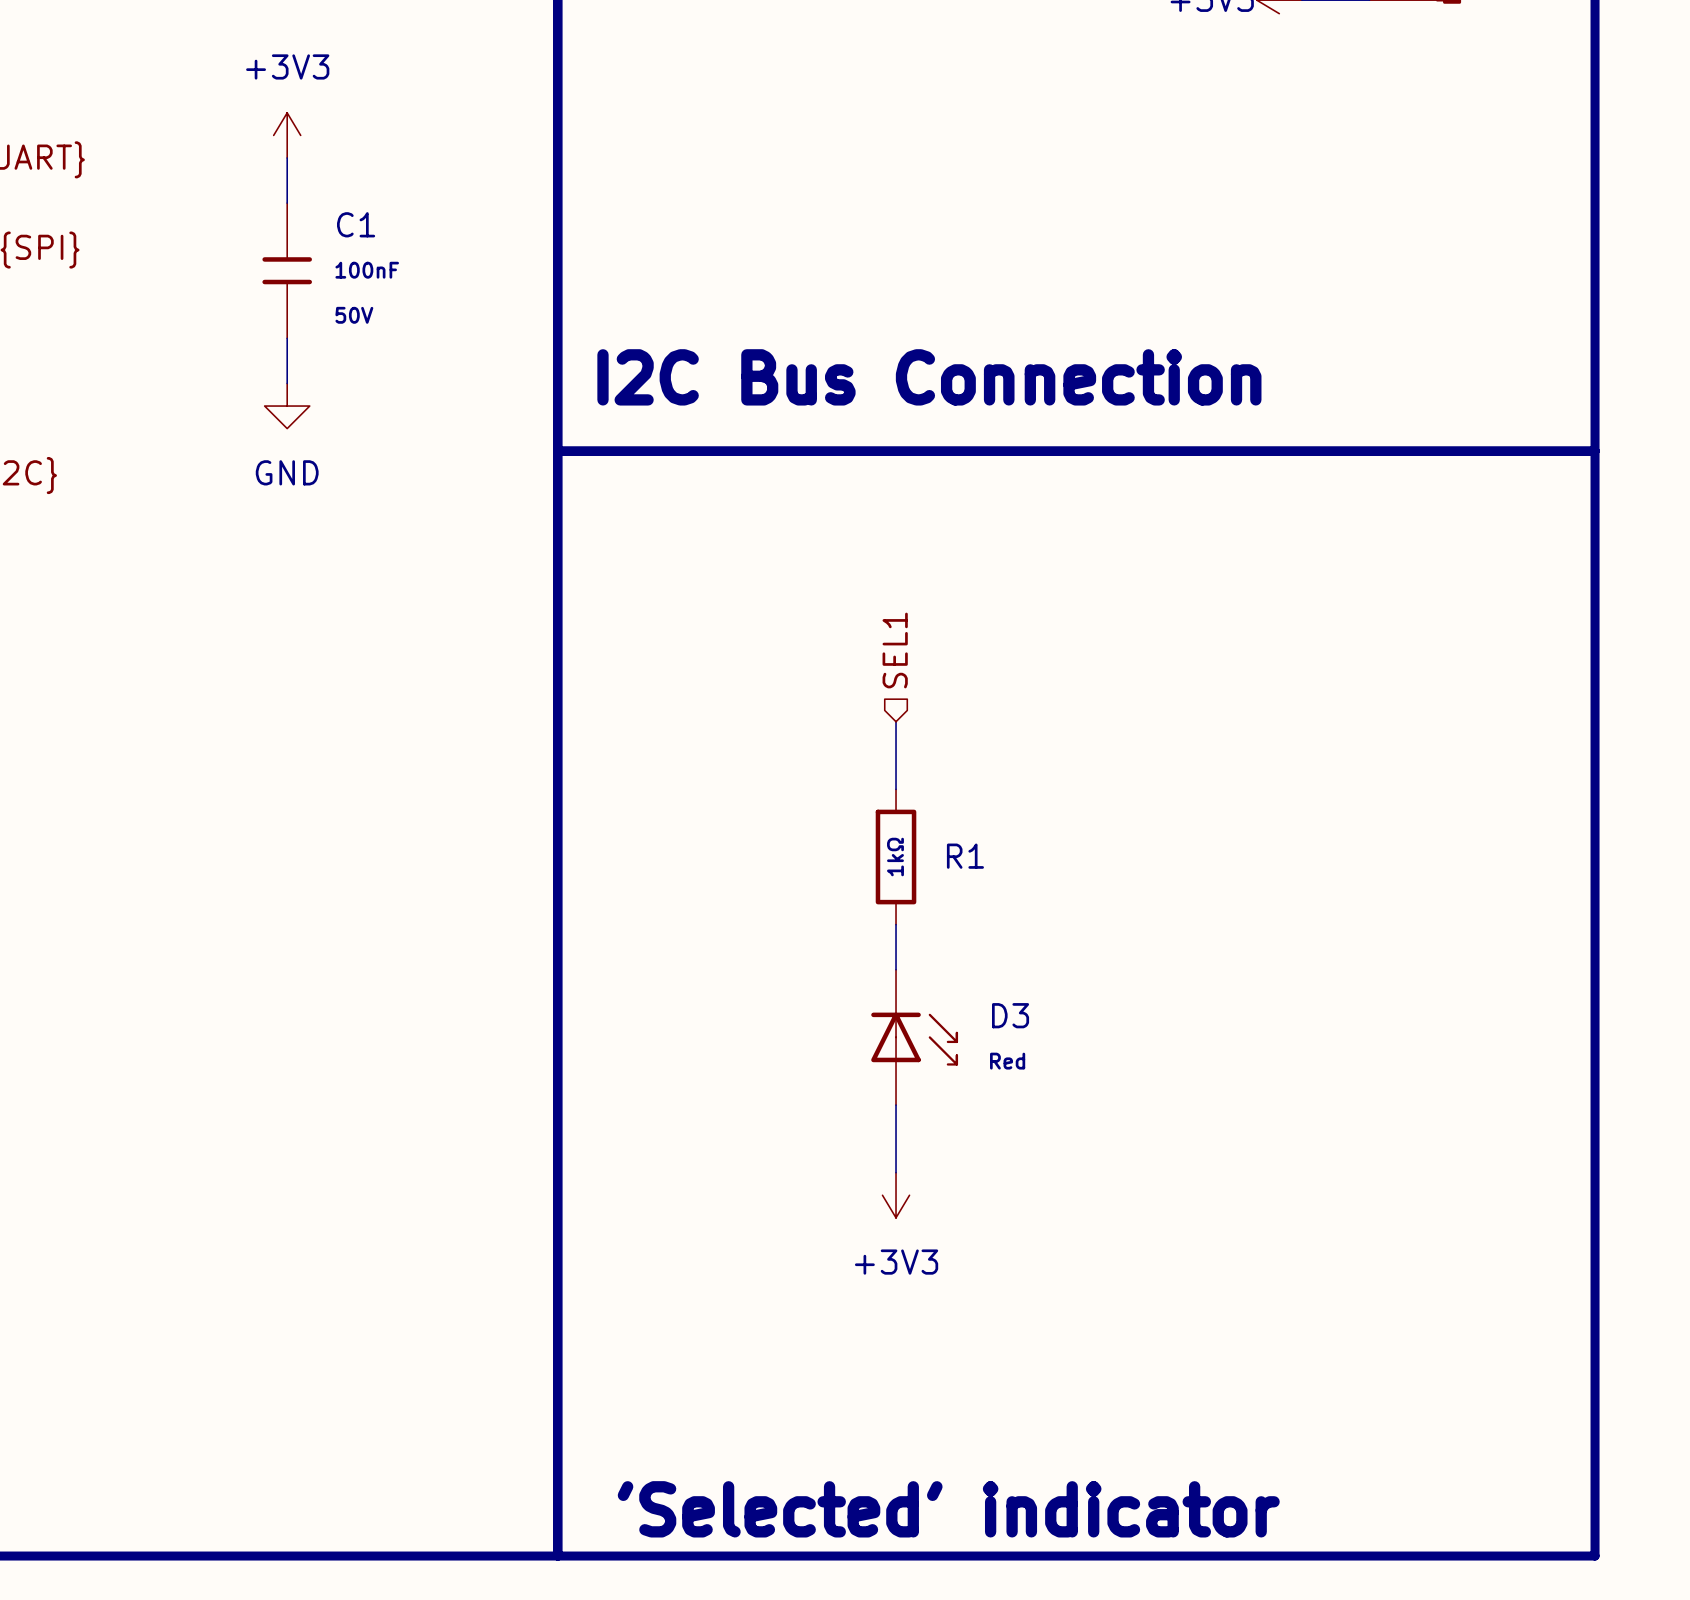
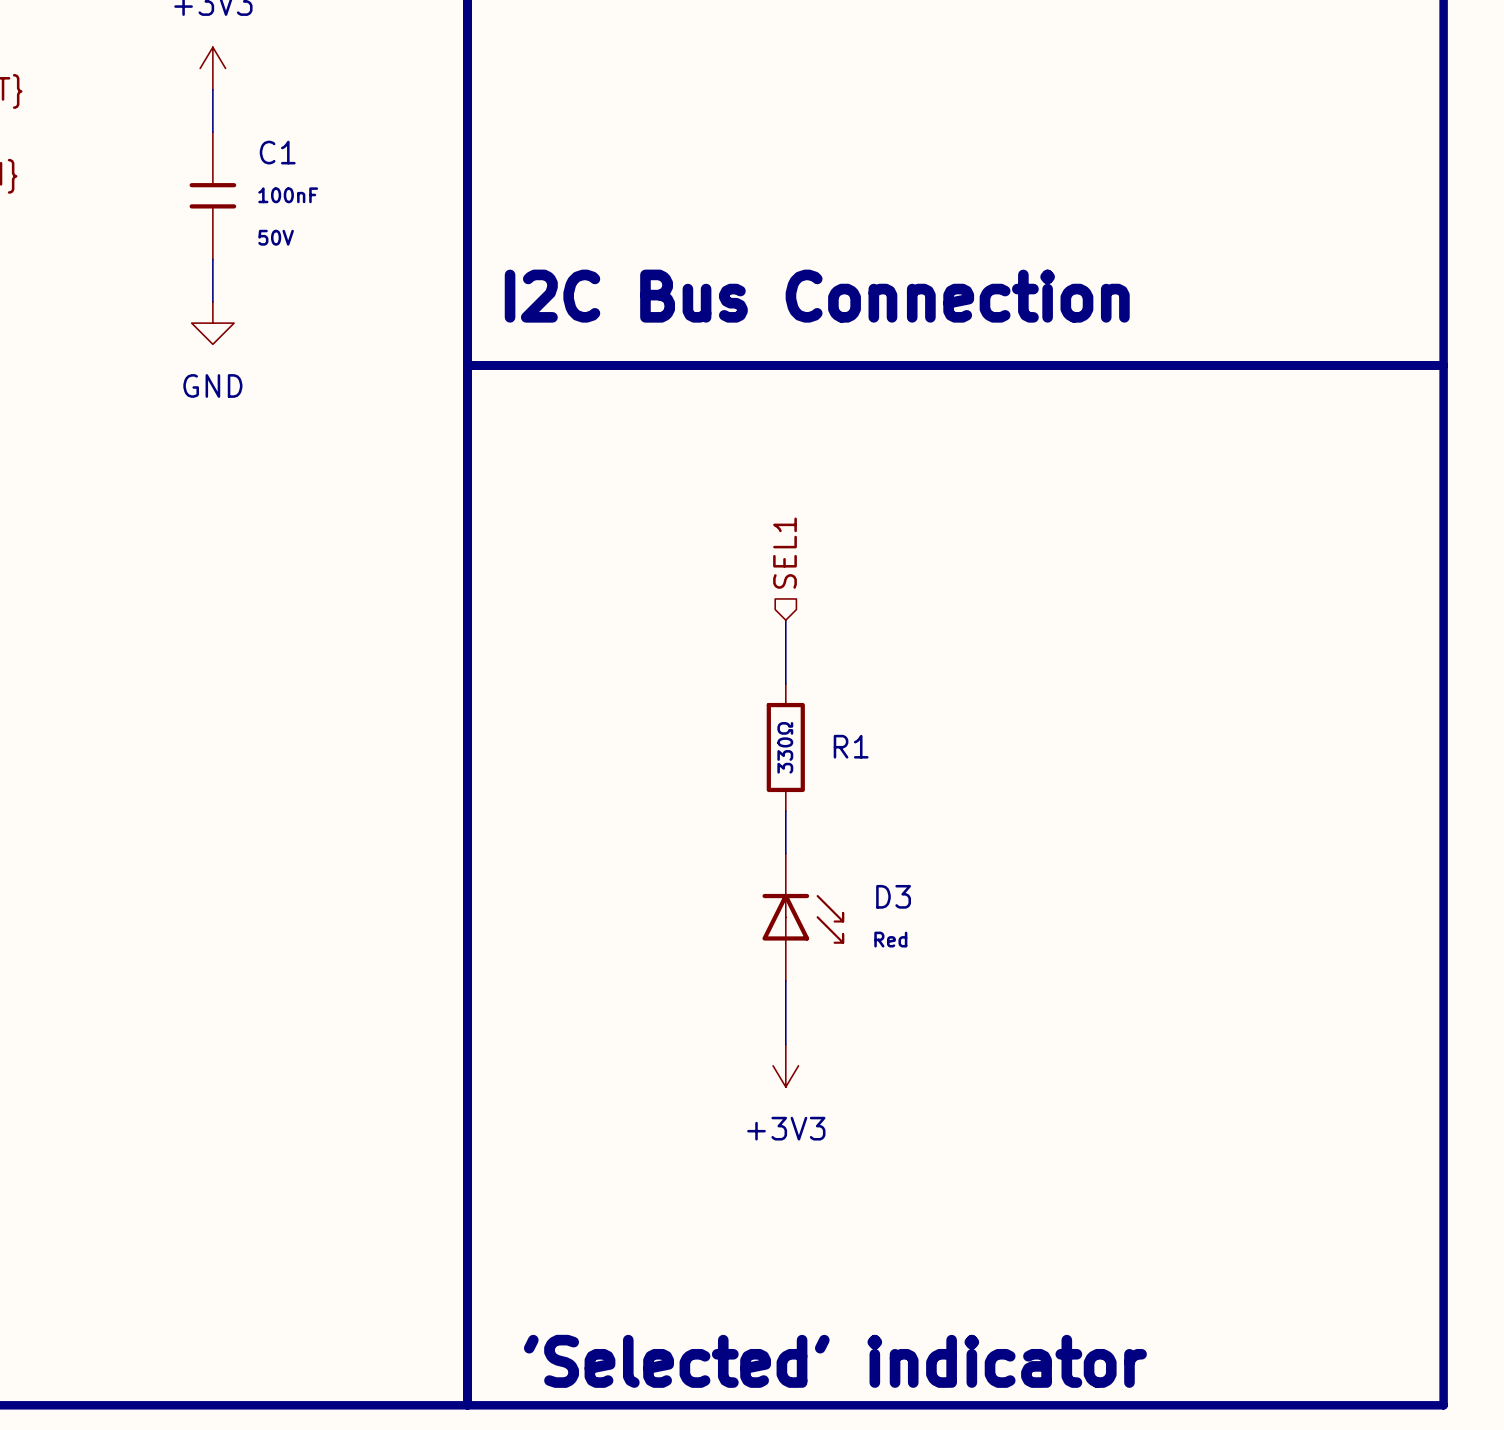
R1 value: 1kΩ (895, 857) -> 330Ω (785, 747)

